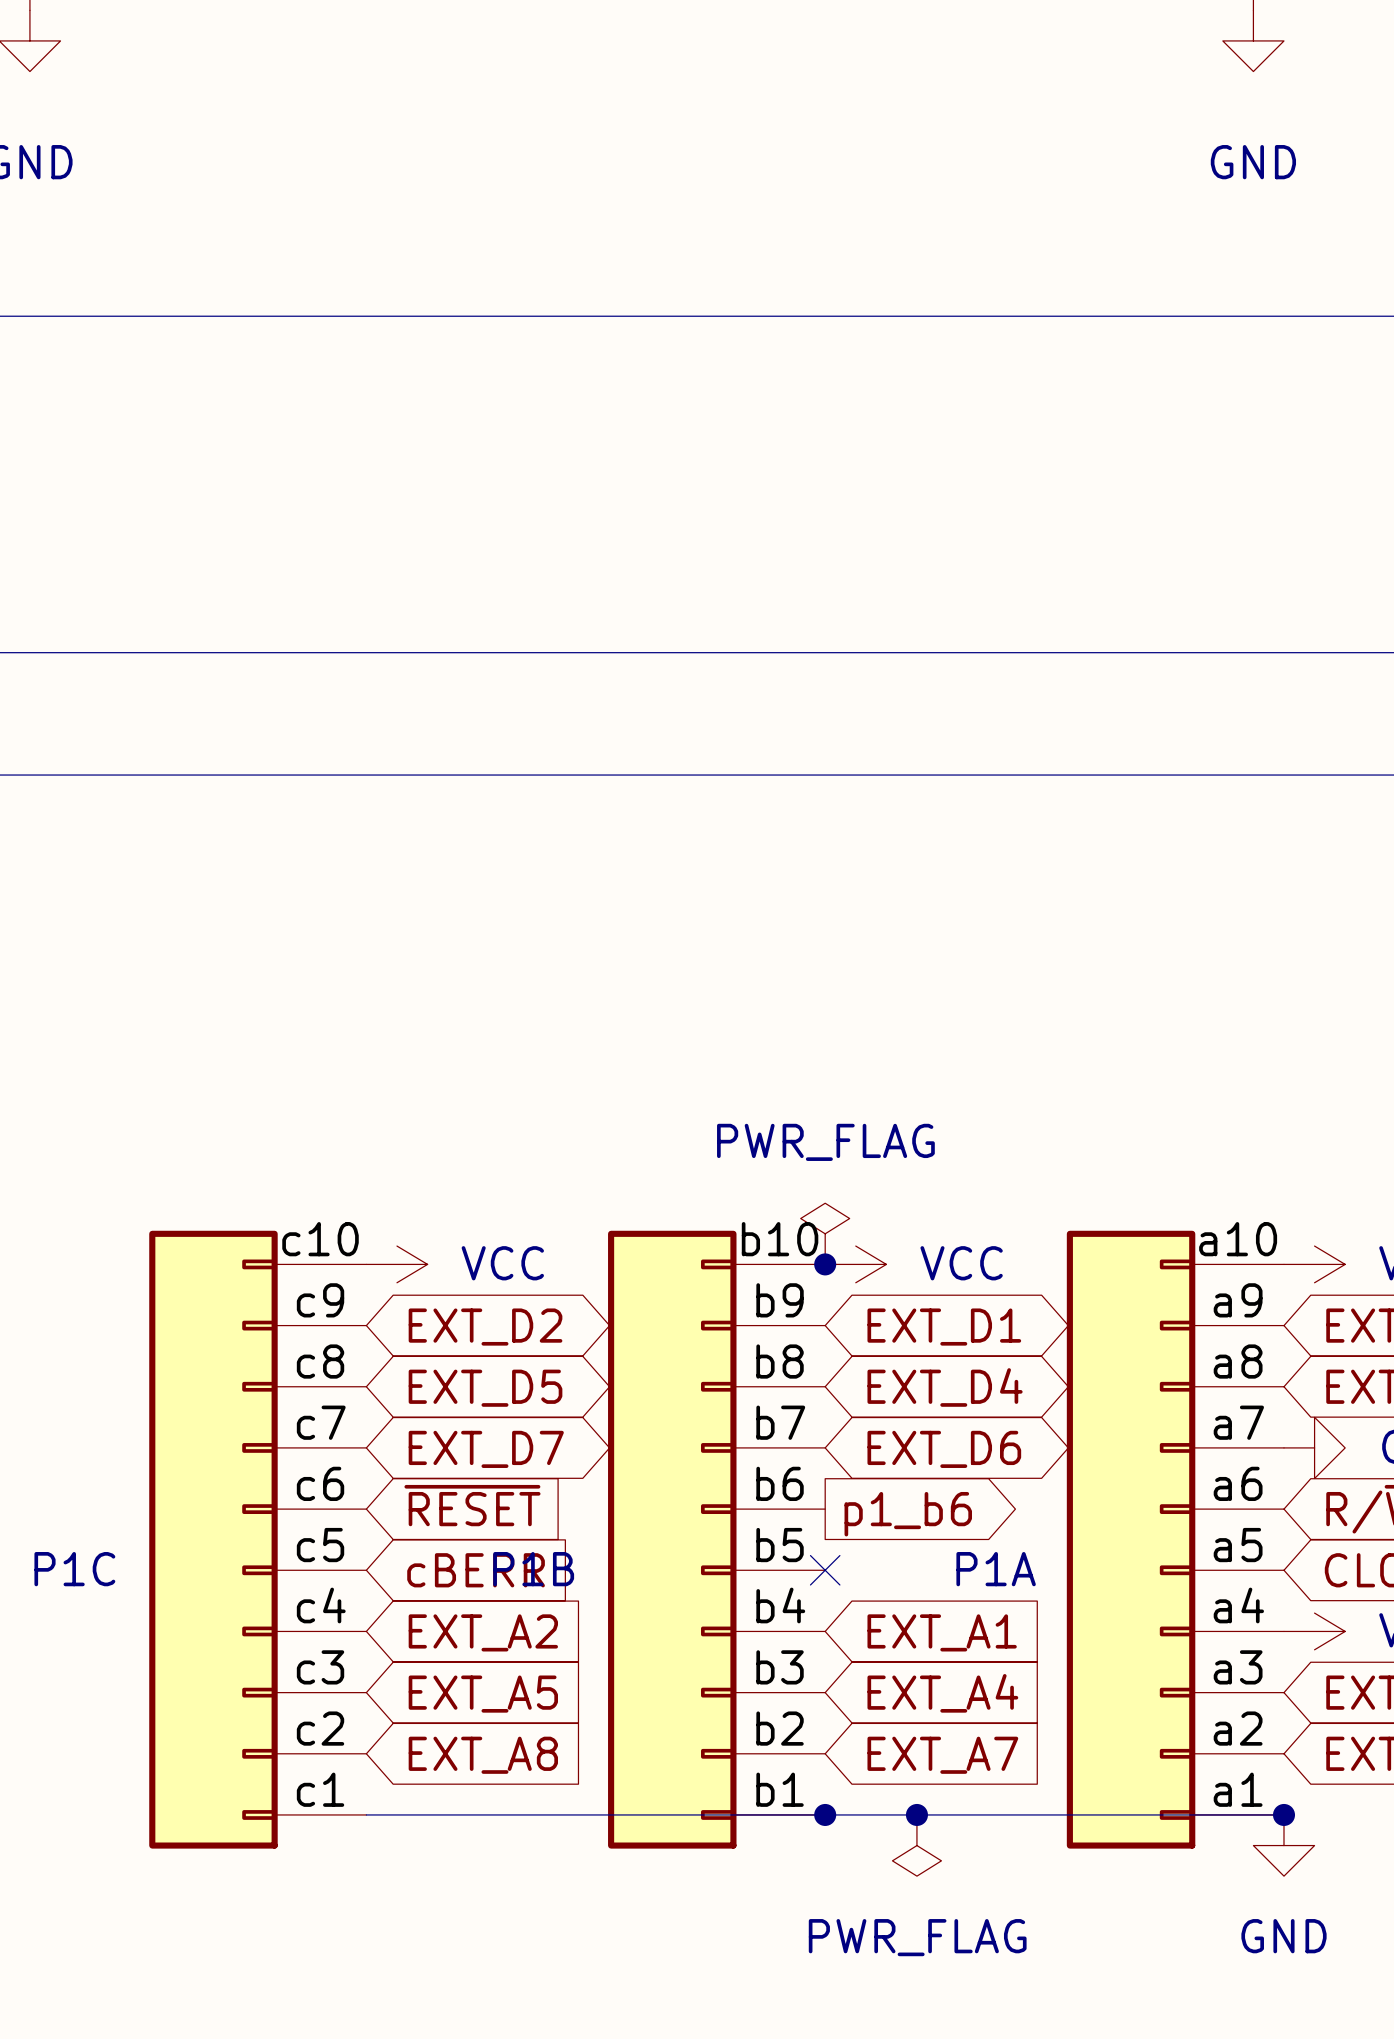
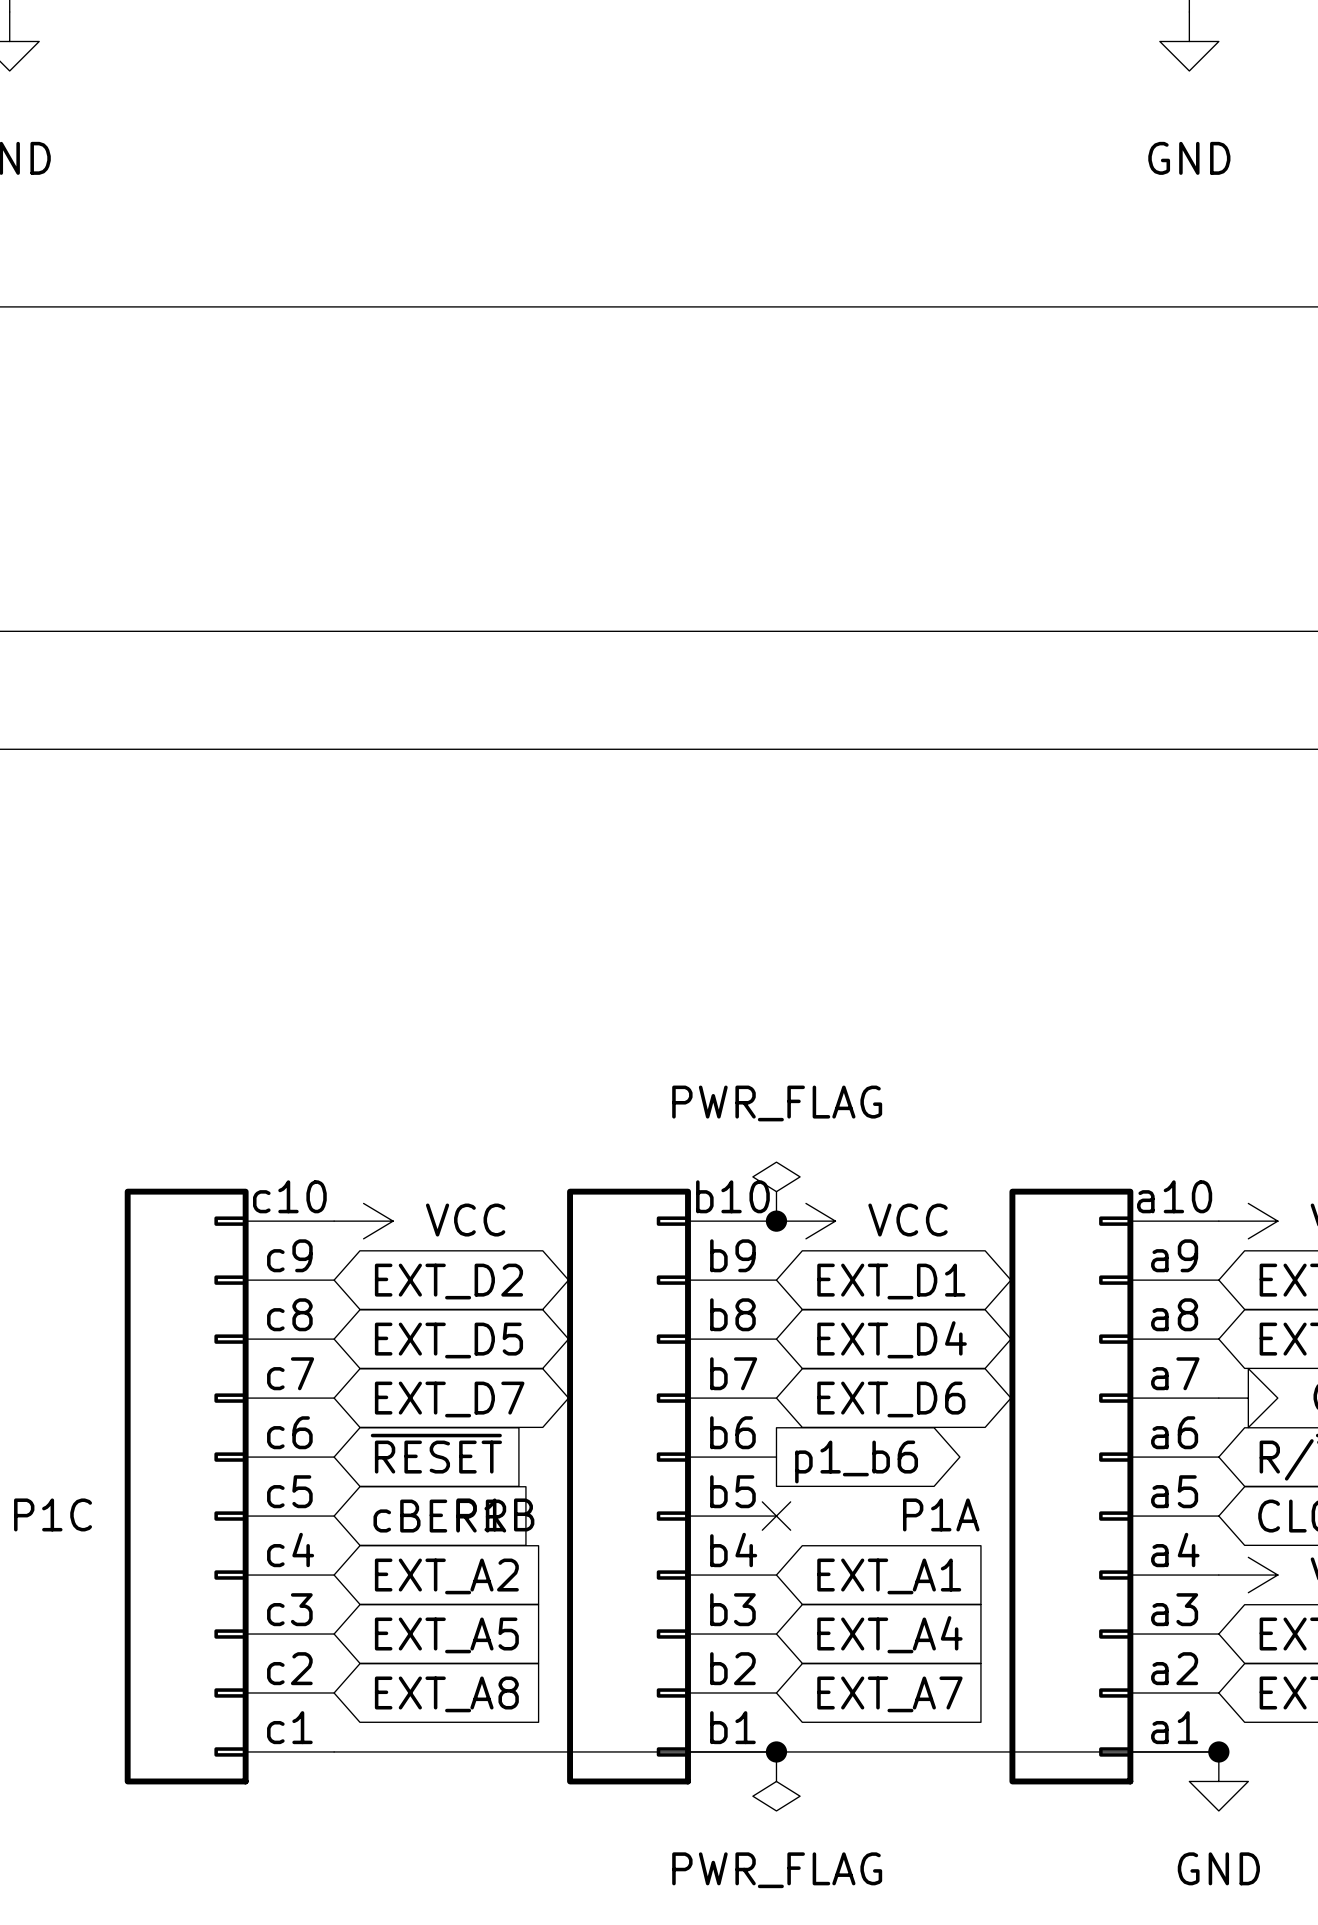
junction: (916, 1814) -> none
power symbol position: PWR_FLAG (916, 1845) -> PWR_FLAG (776, 1781)

